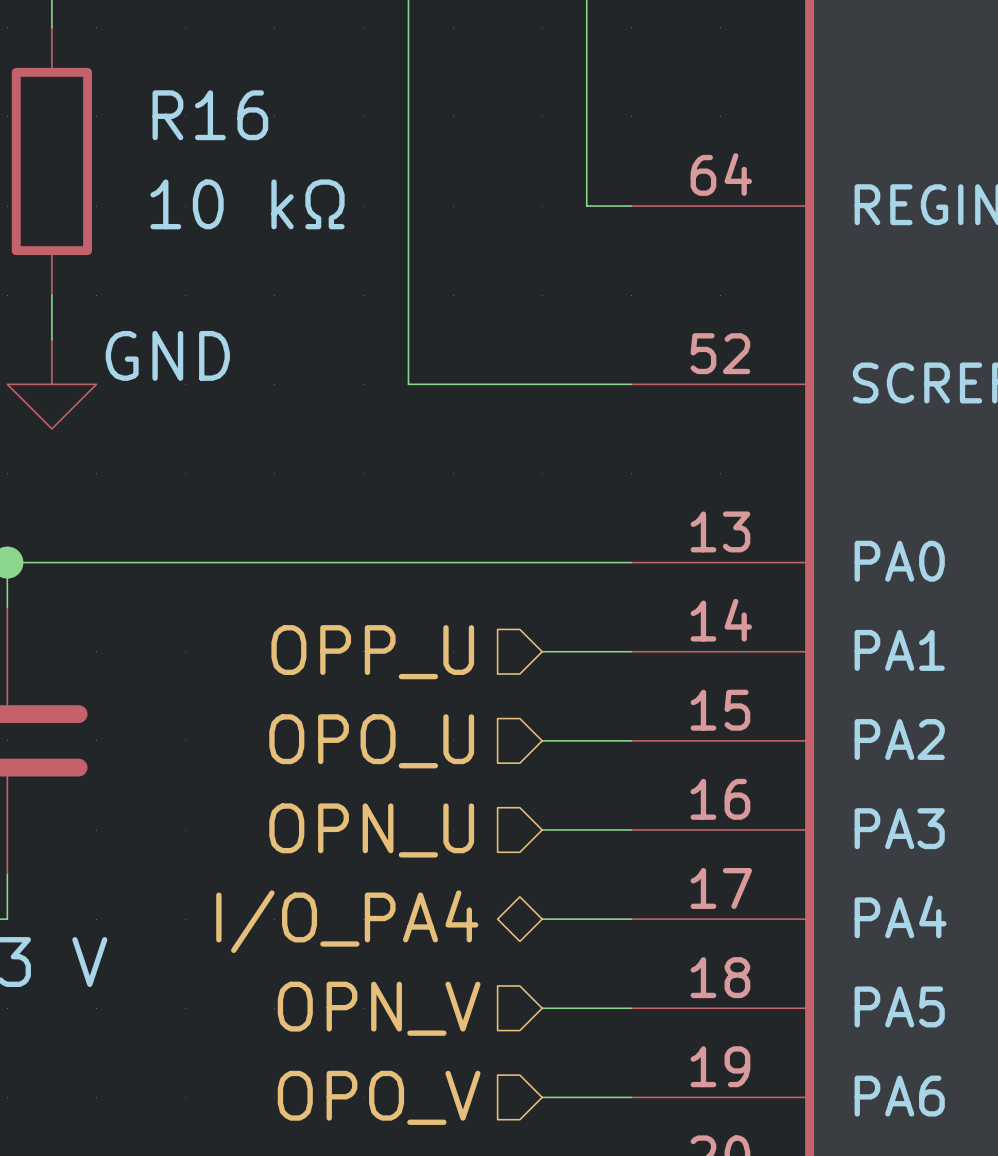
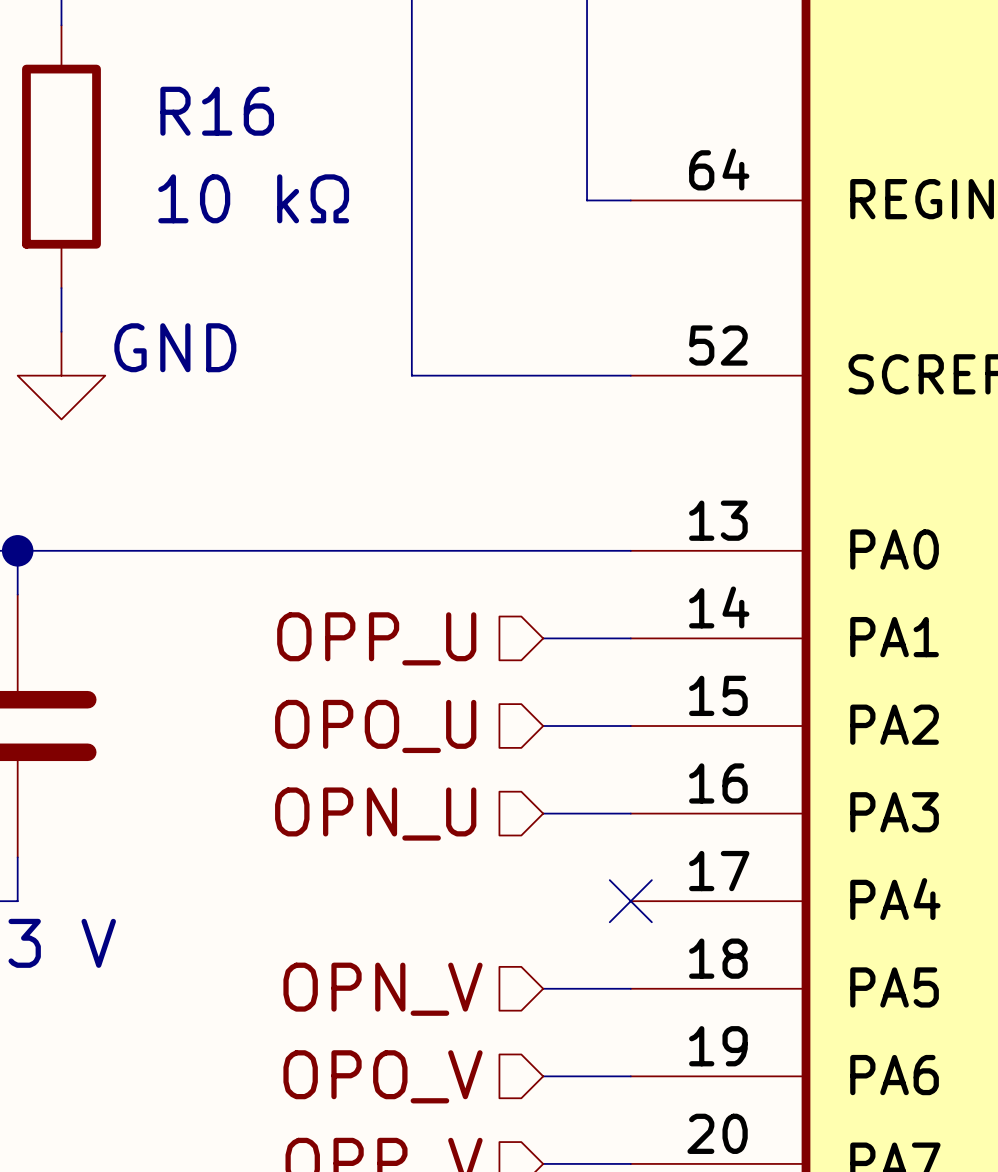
wire: (542, 919) (631, 919) -> none
no-connect mark: none -> (630, 901)
hierarchical label: I/O_PA4 (347, 921) -> none

